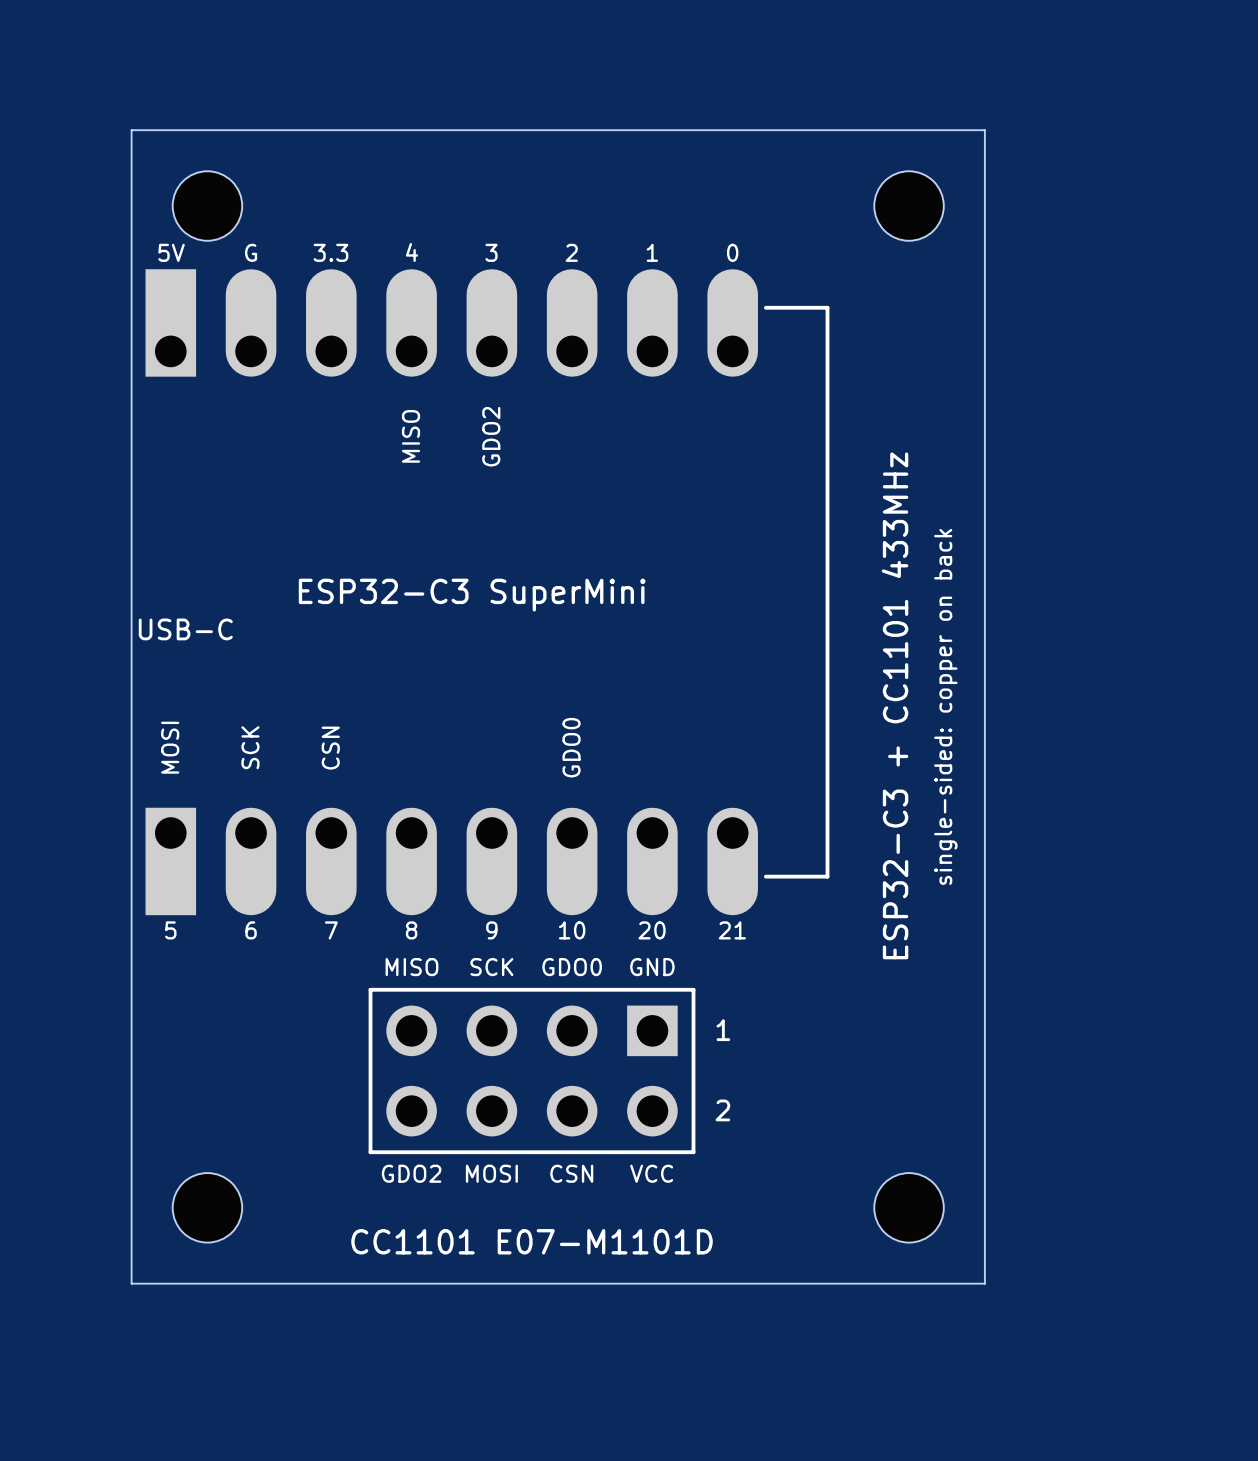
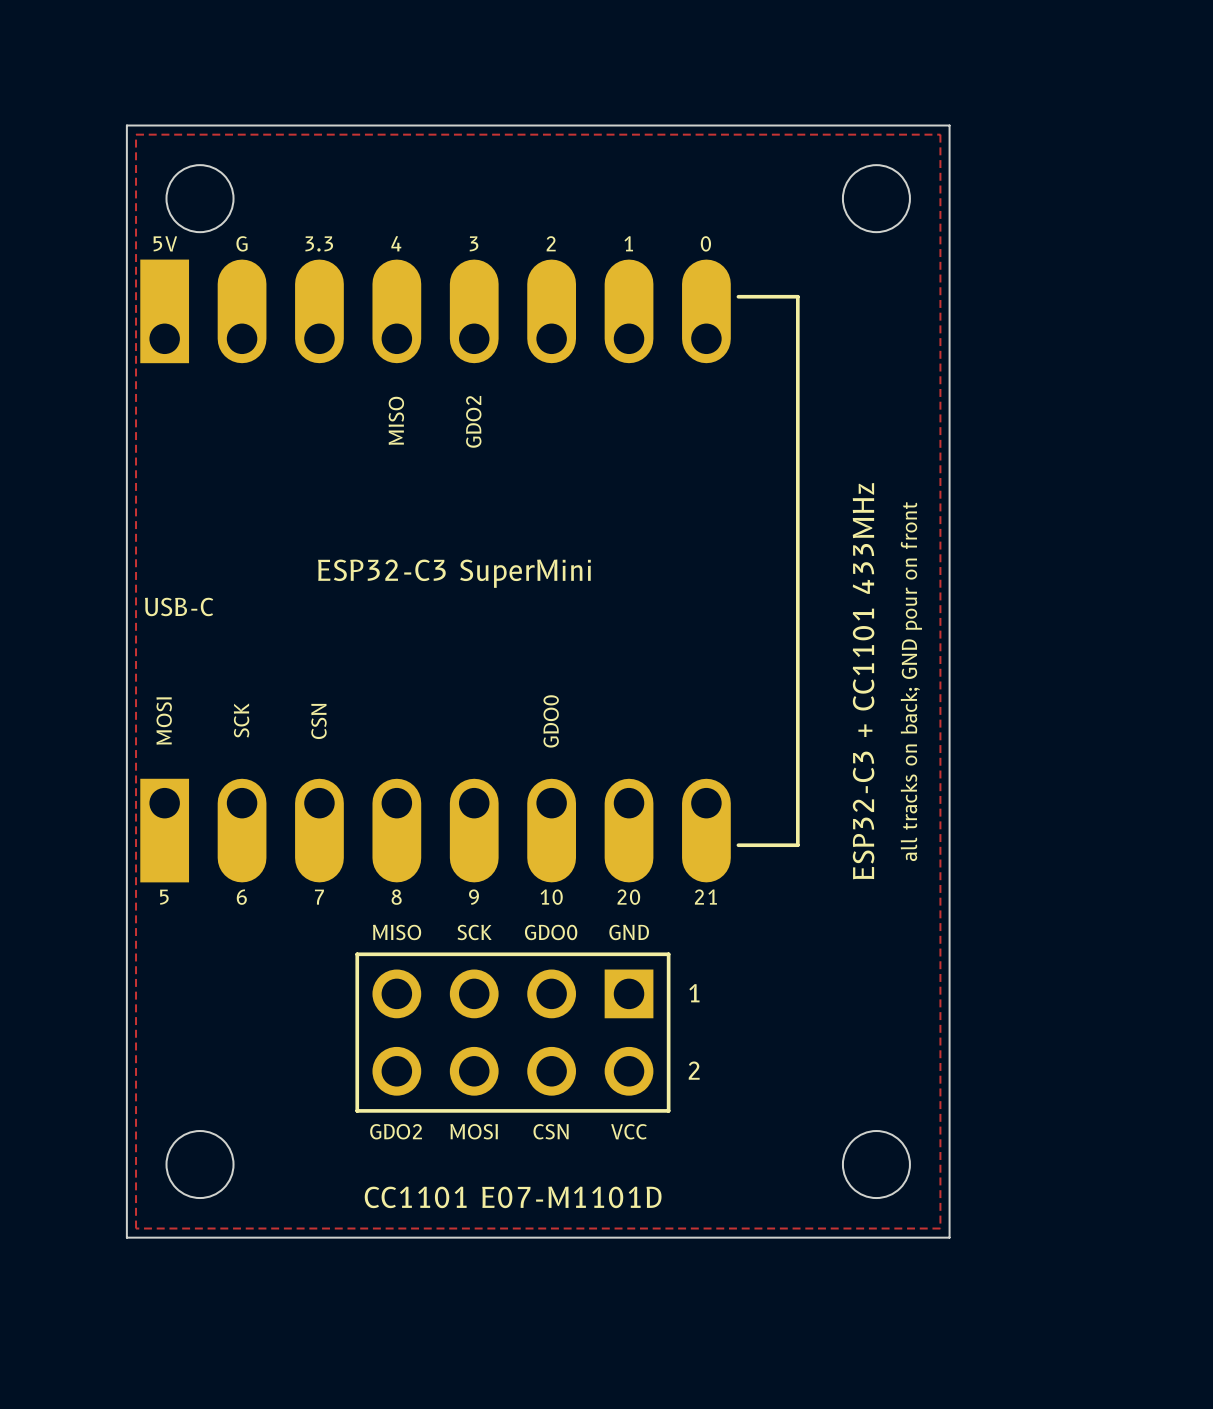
zone outline: none -> (136, 134) (940, 134) (940, 1228) (136, 1228) (136, 134)
text: single-sided: copper on back (945, 706) -> all tracks on back; GND pour on front (911, 681)

